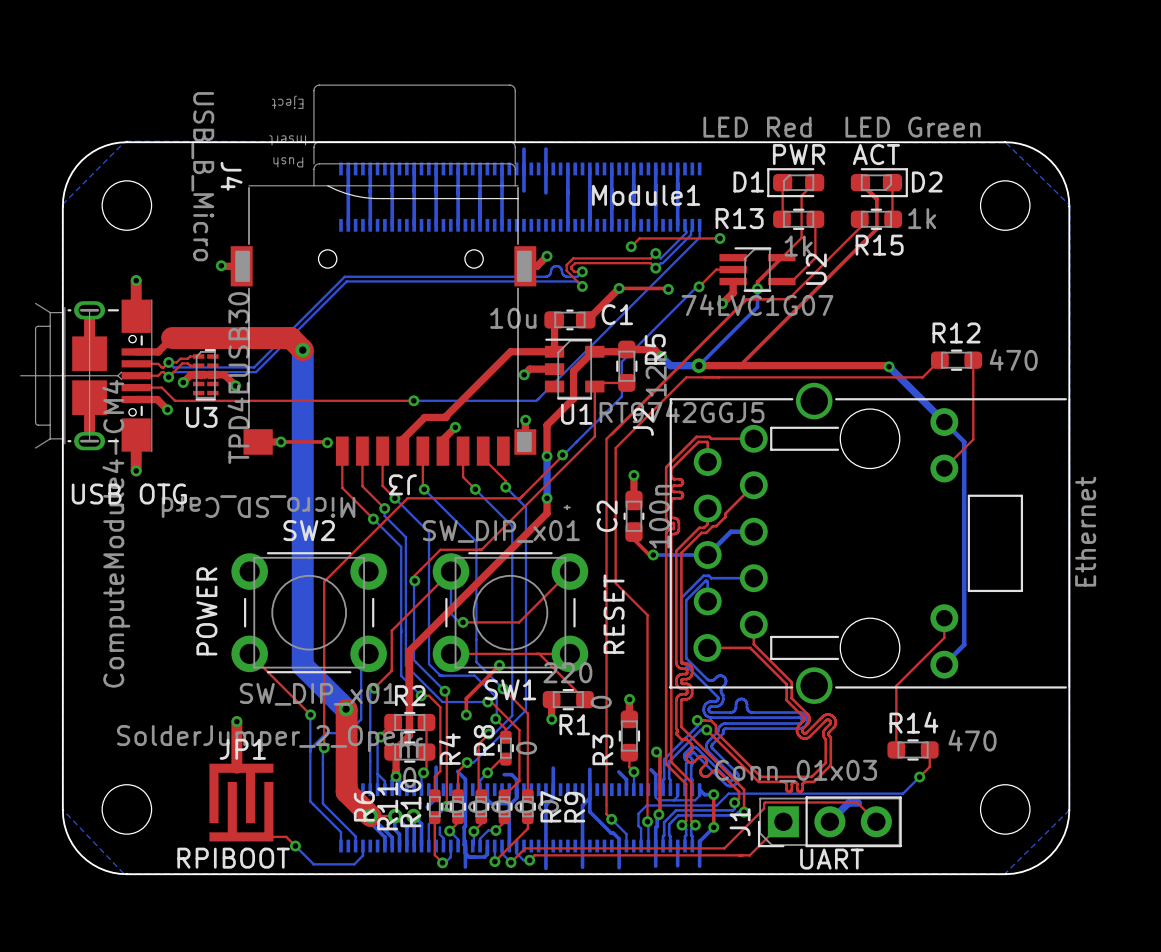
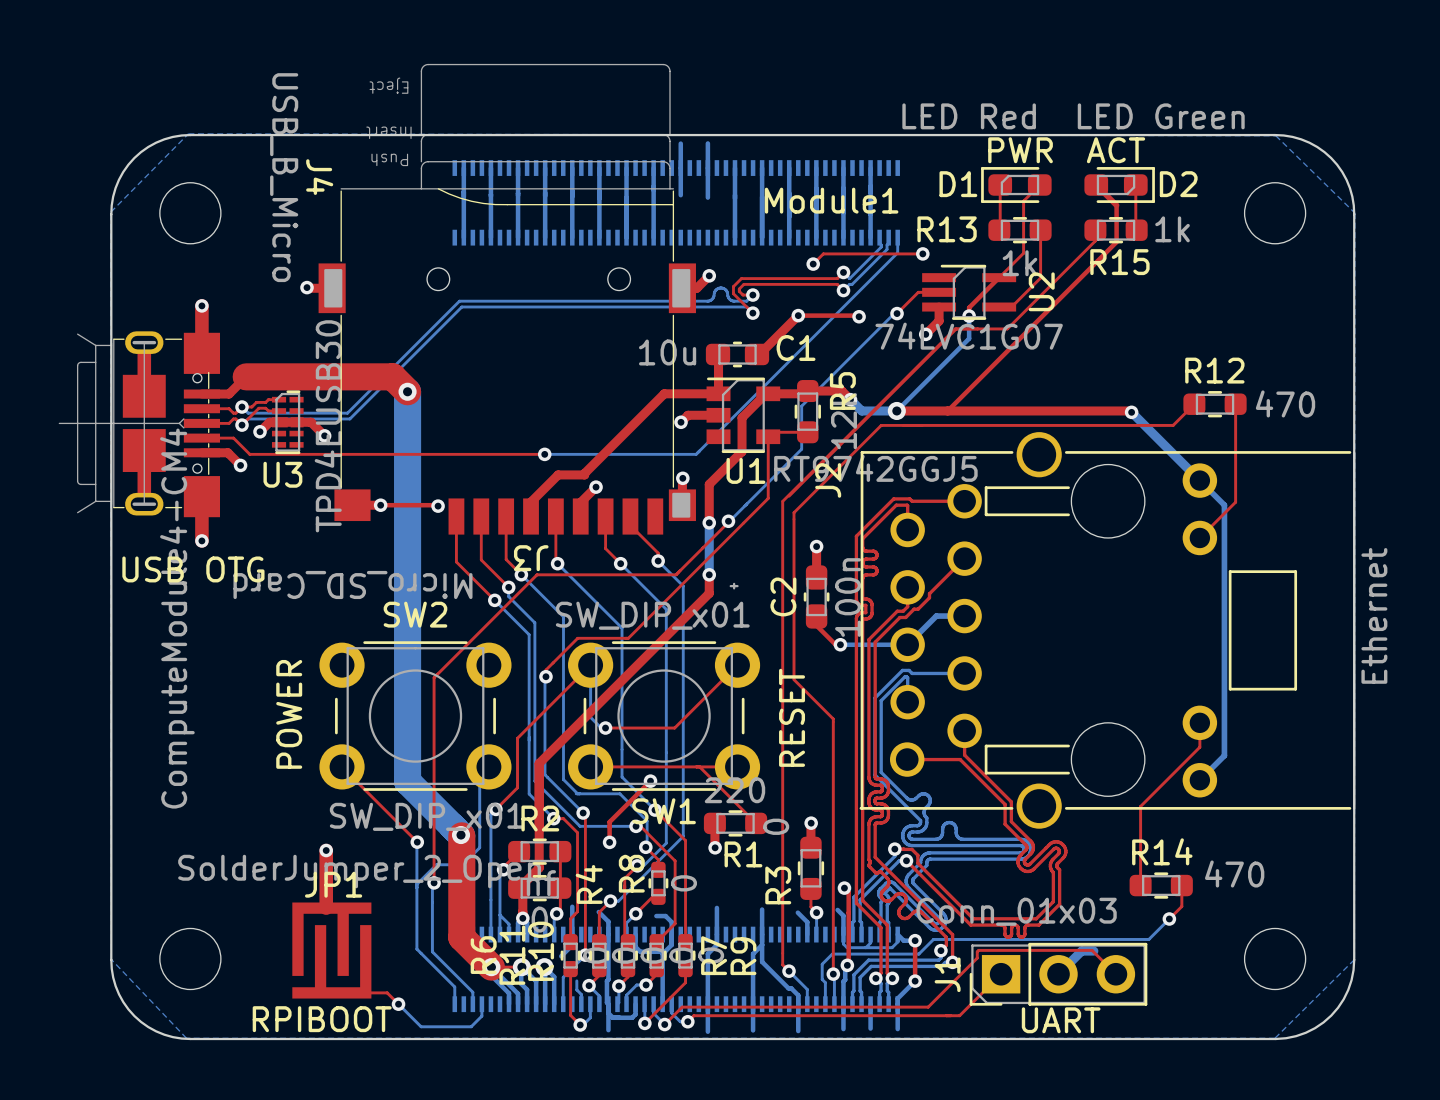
J4 footprint: [20, 299, 153, 452] -> [59, 331, 221, 518]

